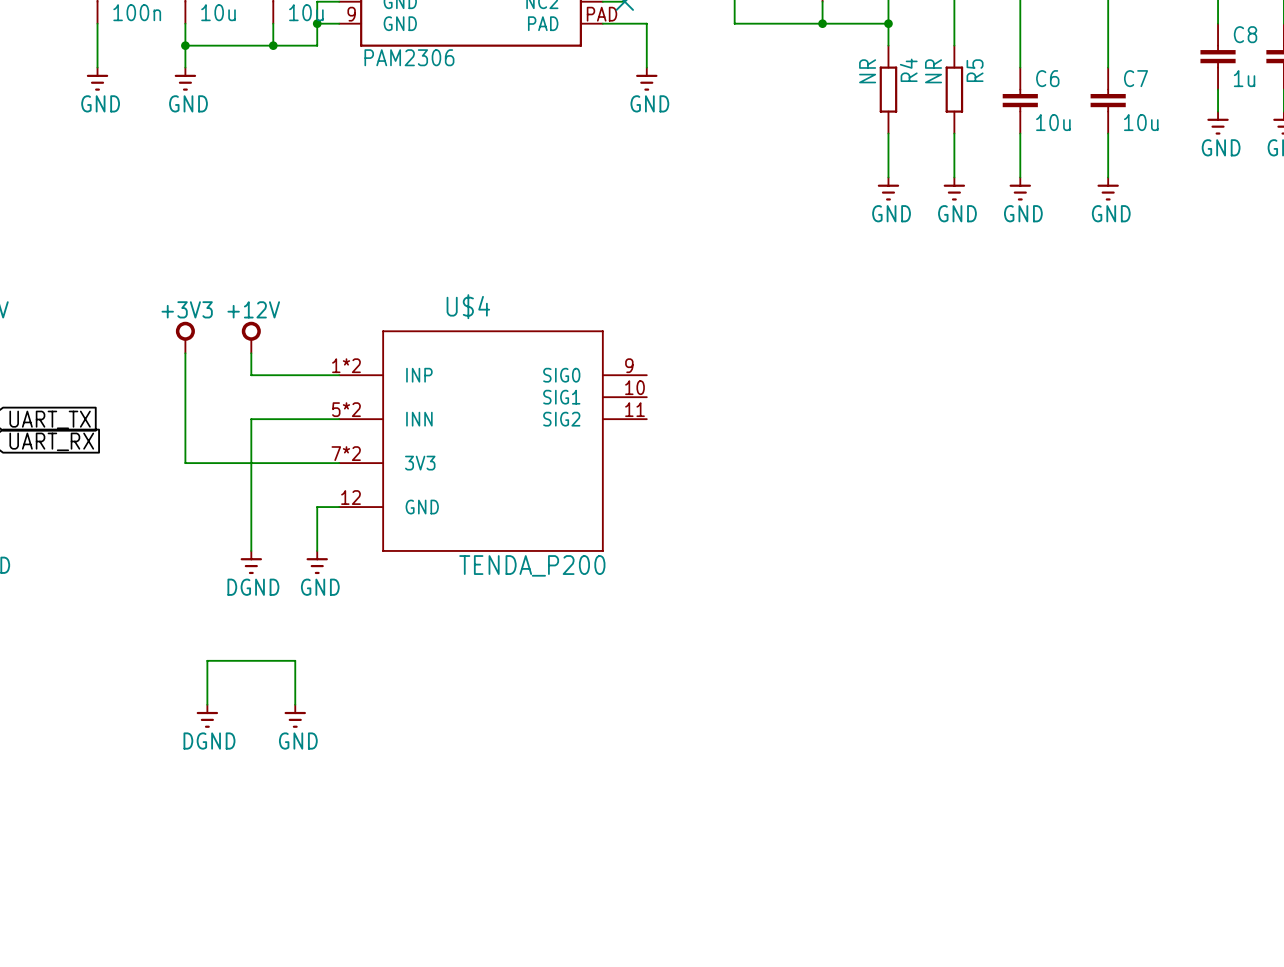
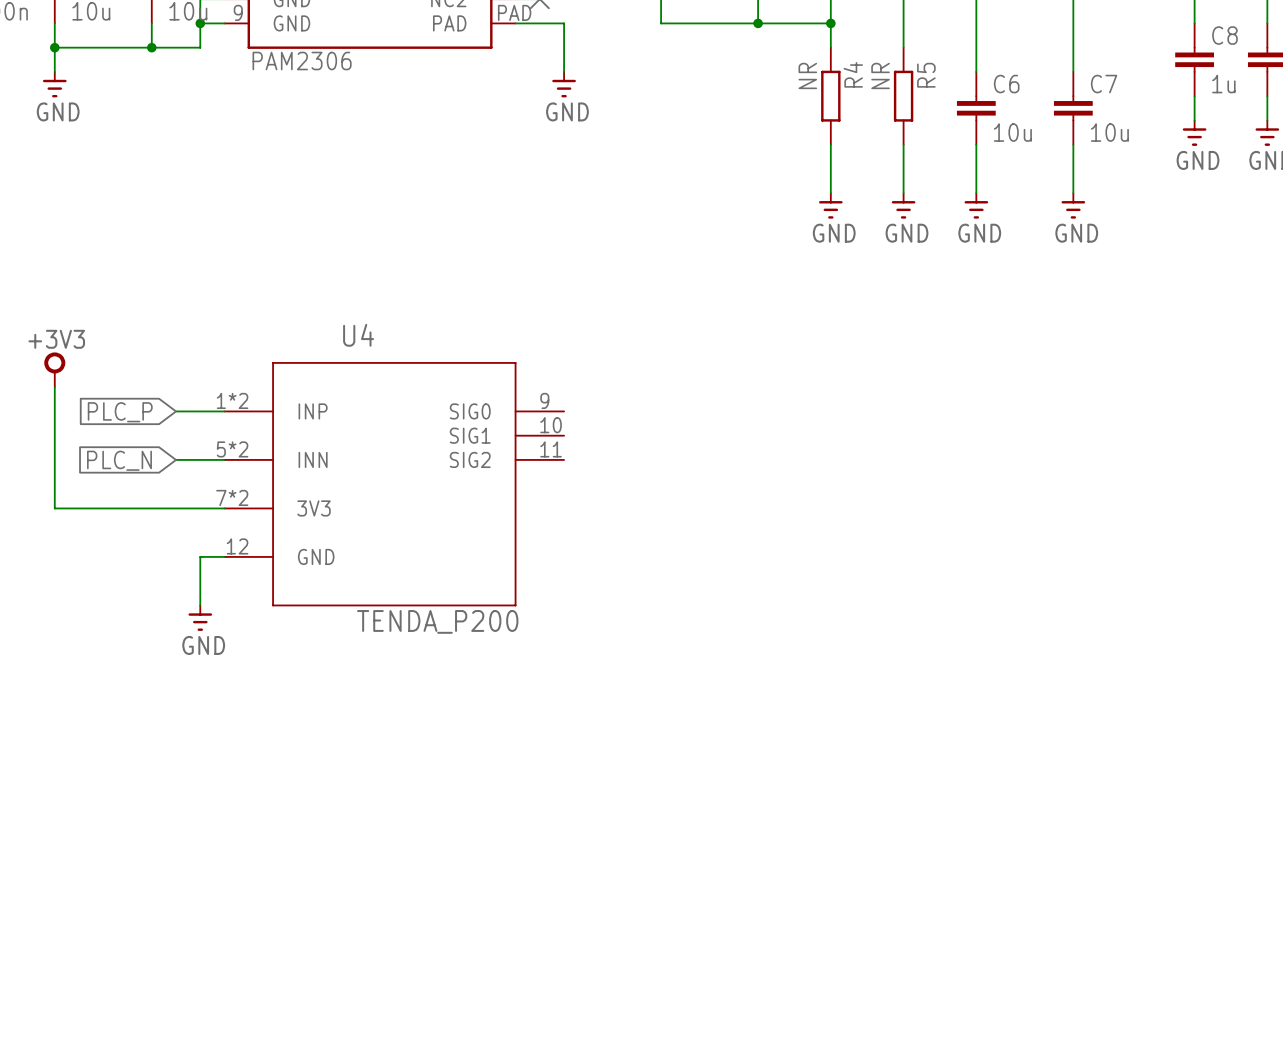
U$4 name: U$4 (468, 306) -> U4 (358, 335)
power symbol: +12V (251, 337) -> none
wire: (251, 353) (251, 375) (295, 375) -> none
global label: none -> PLC_P (120, 412)
global label: none -> PLC_N (119, 460)
wire: (295, 419) (251, 419) (251, 550) -> none
power symbol: DGND (251, 562) -> none
wire: (207, 704) (207, 660) (295, 660) (295, 704) -> none
power symbol: DGND (207, 715) -> none
power symbol: GND (295, 715) -> none

